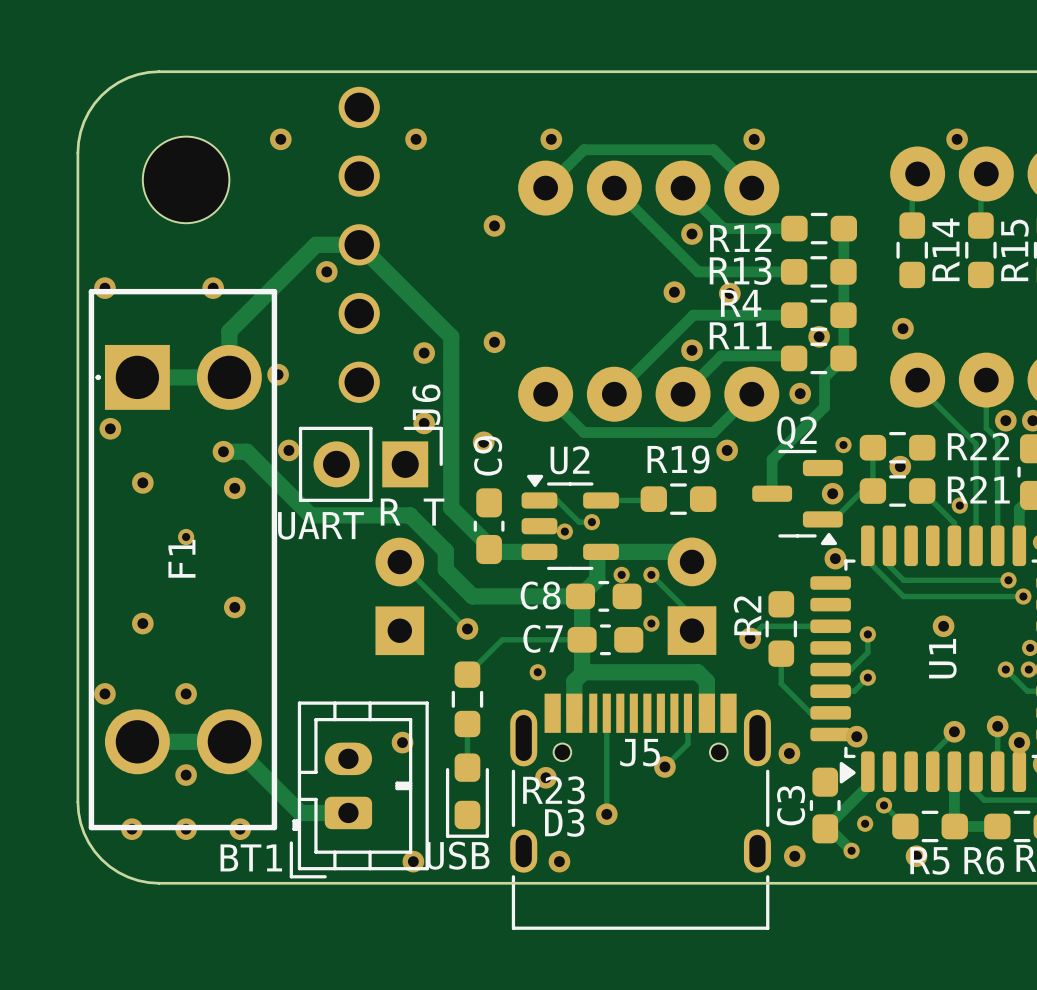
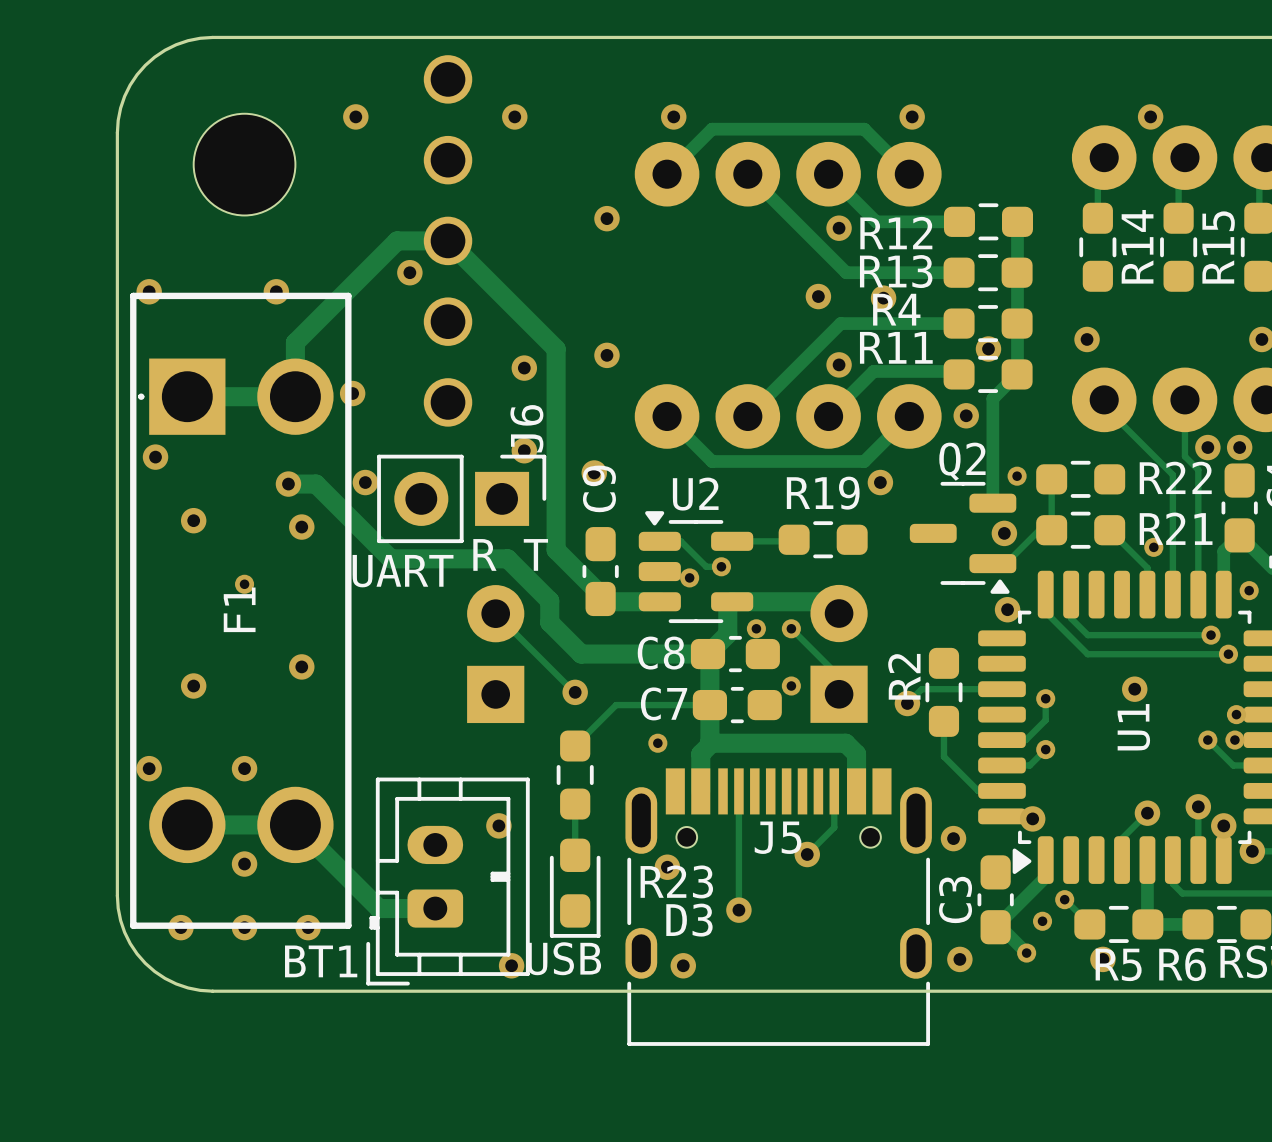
track: (824, 377) (824, 407) (772, 459) (772, 493) -> (994, 396) (992, 398) (992, 503)
via: (900, 466) -> none

